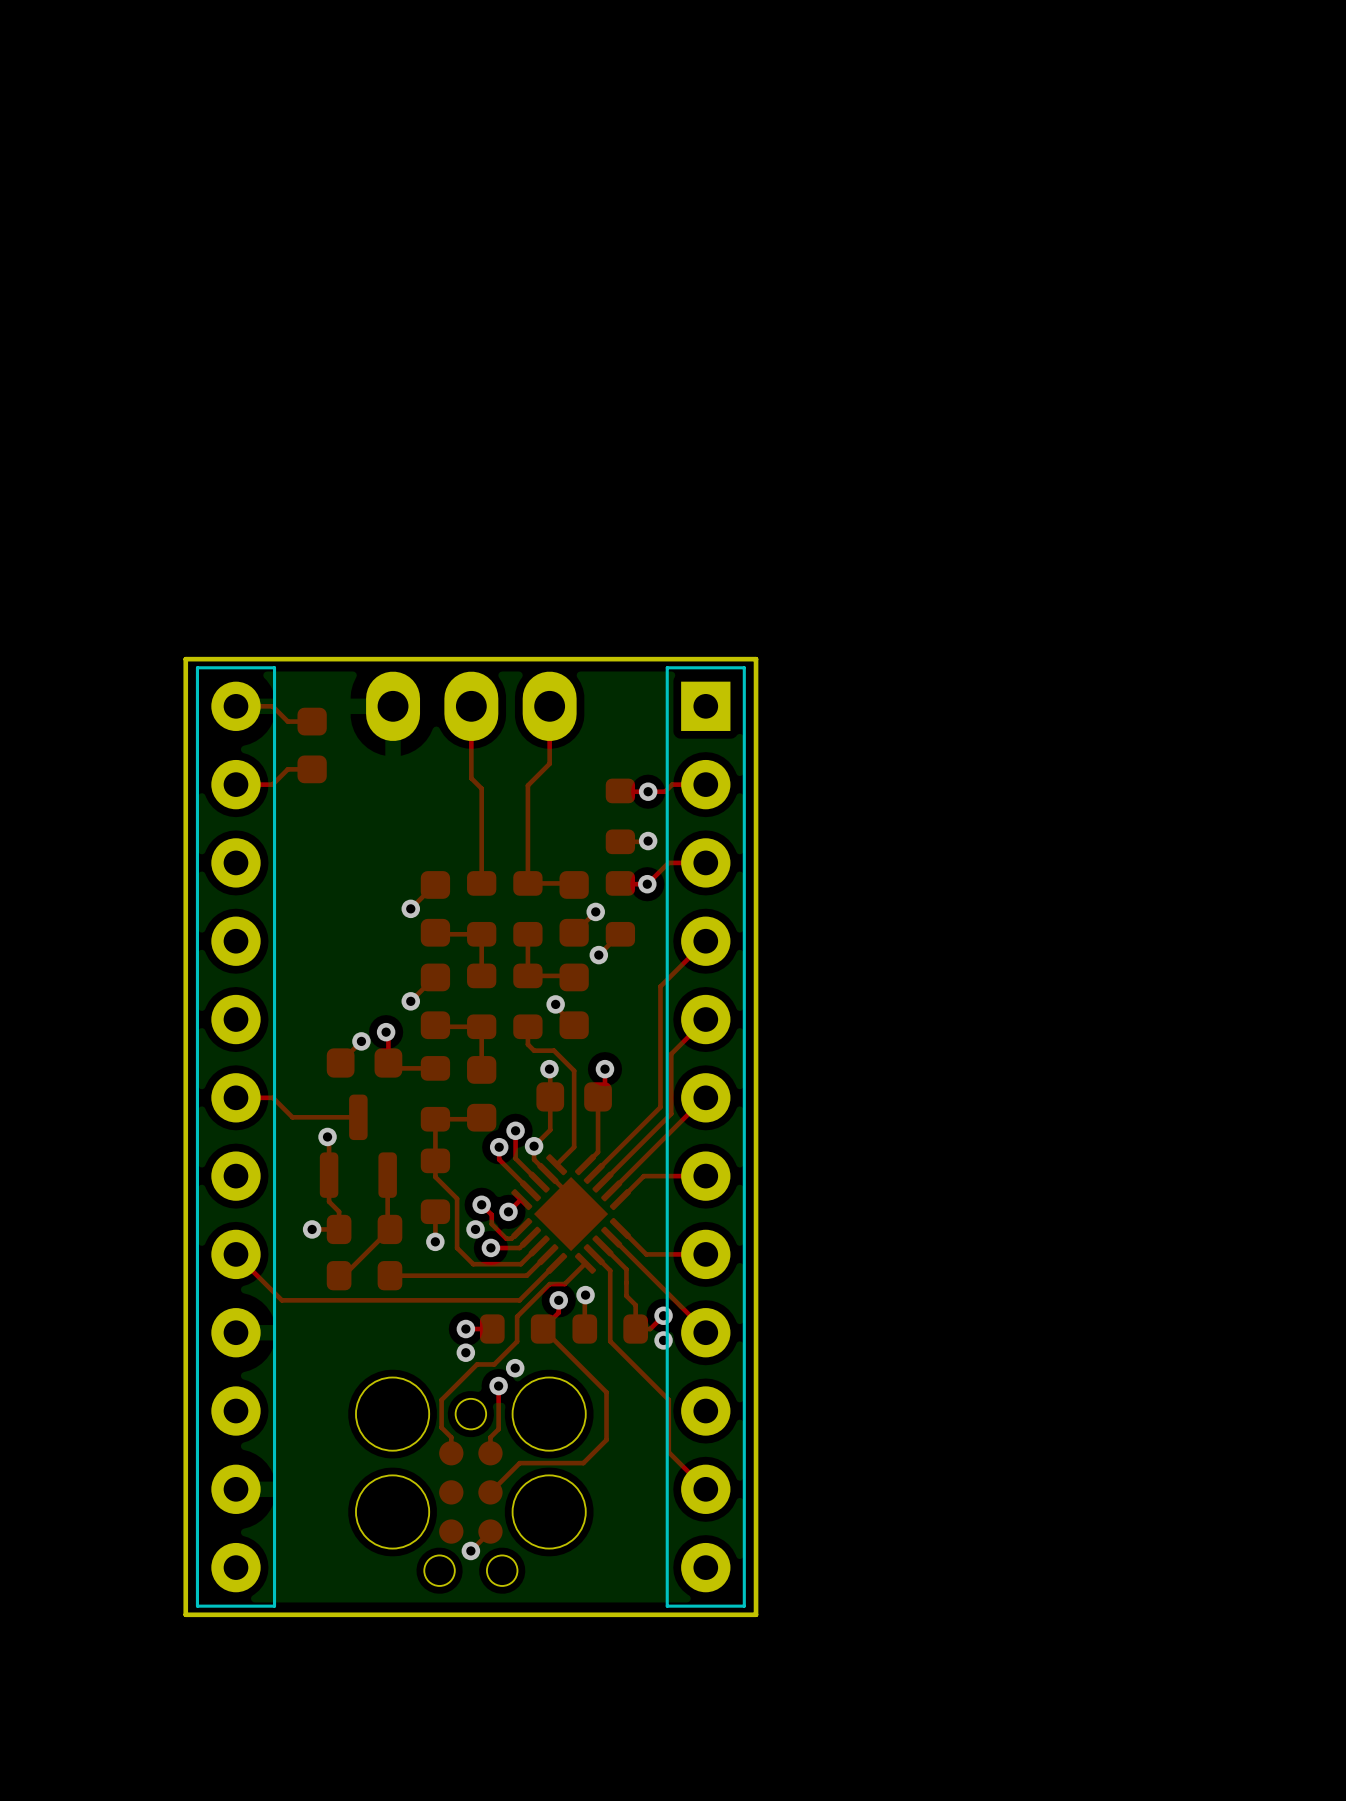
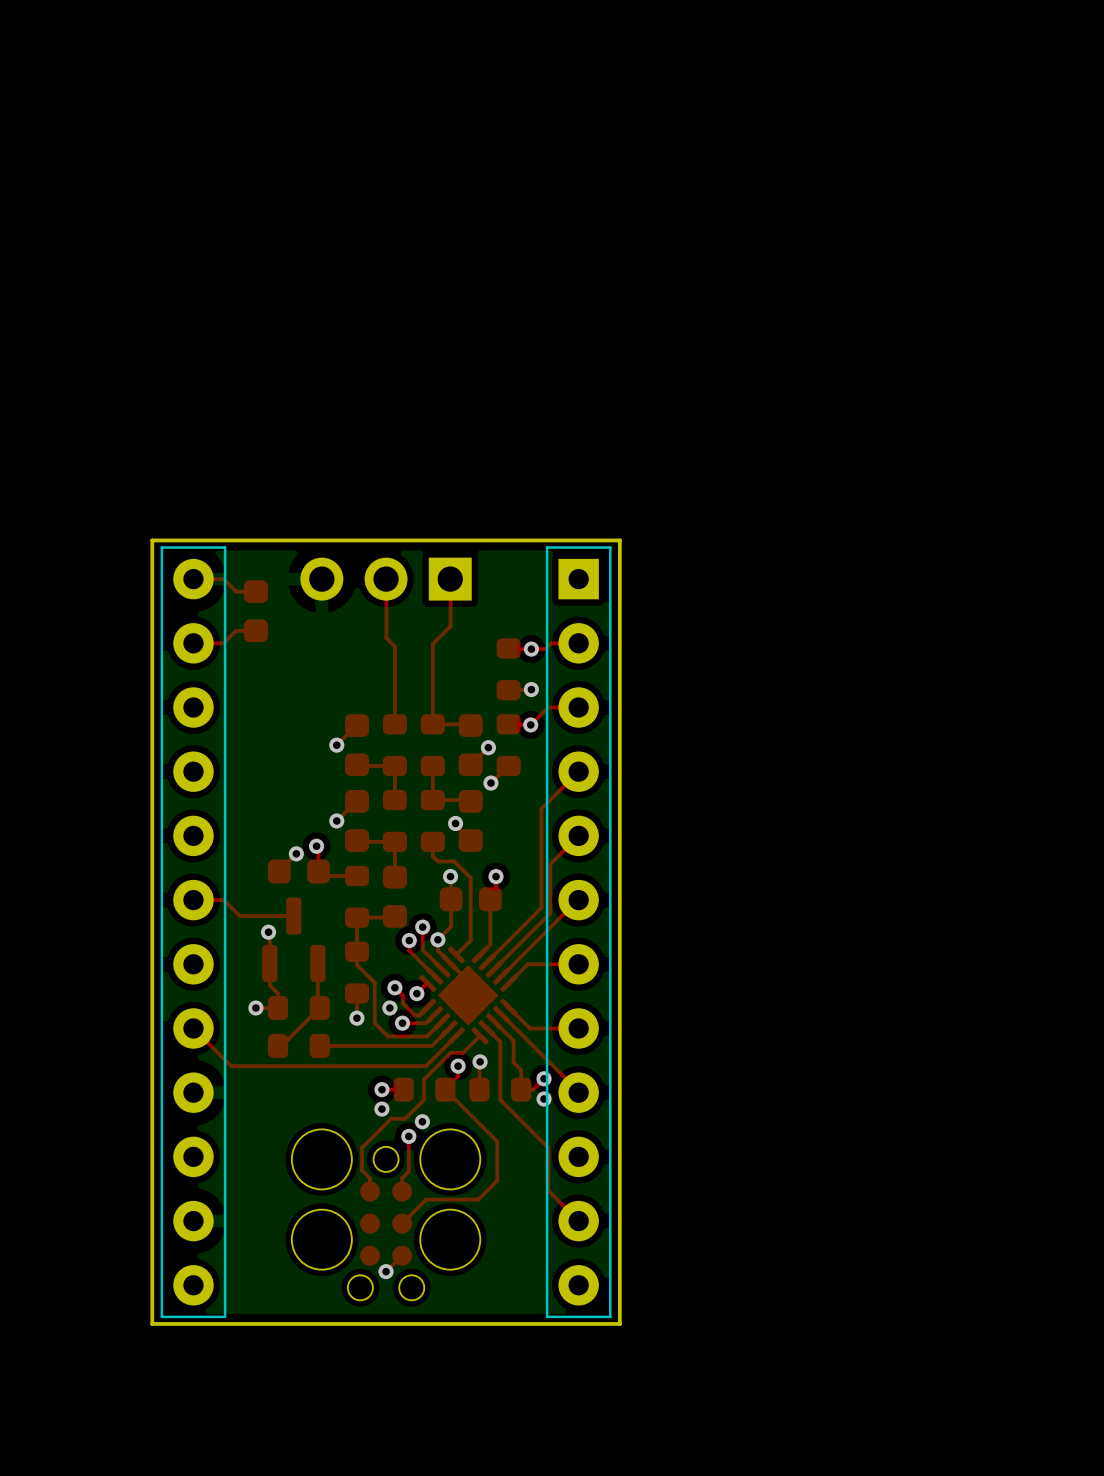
part footprint: [366, 671, 577, 742] -> [300, 557, 472, 601]

